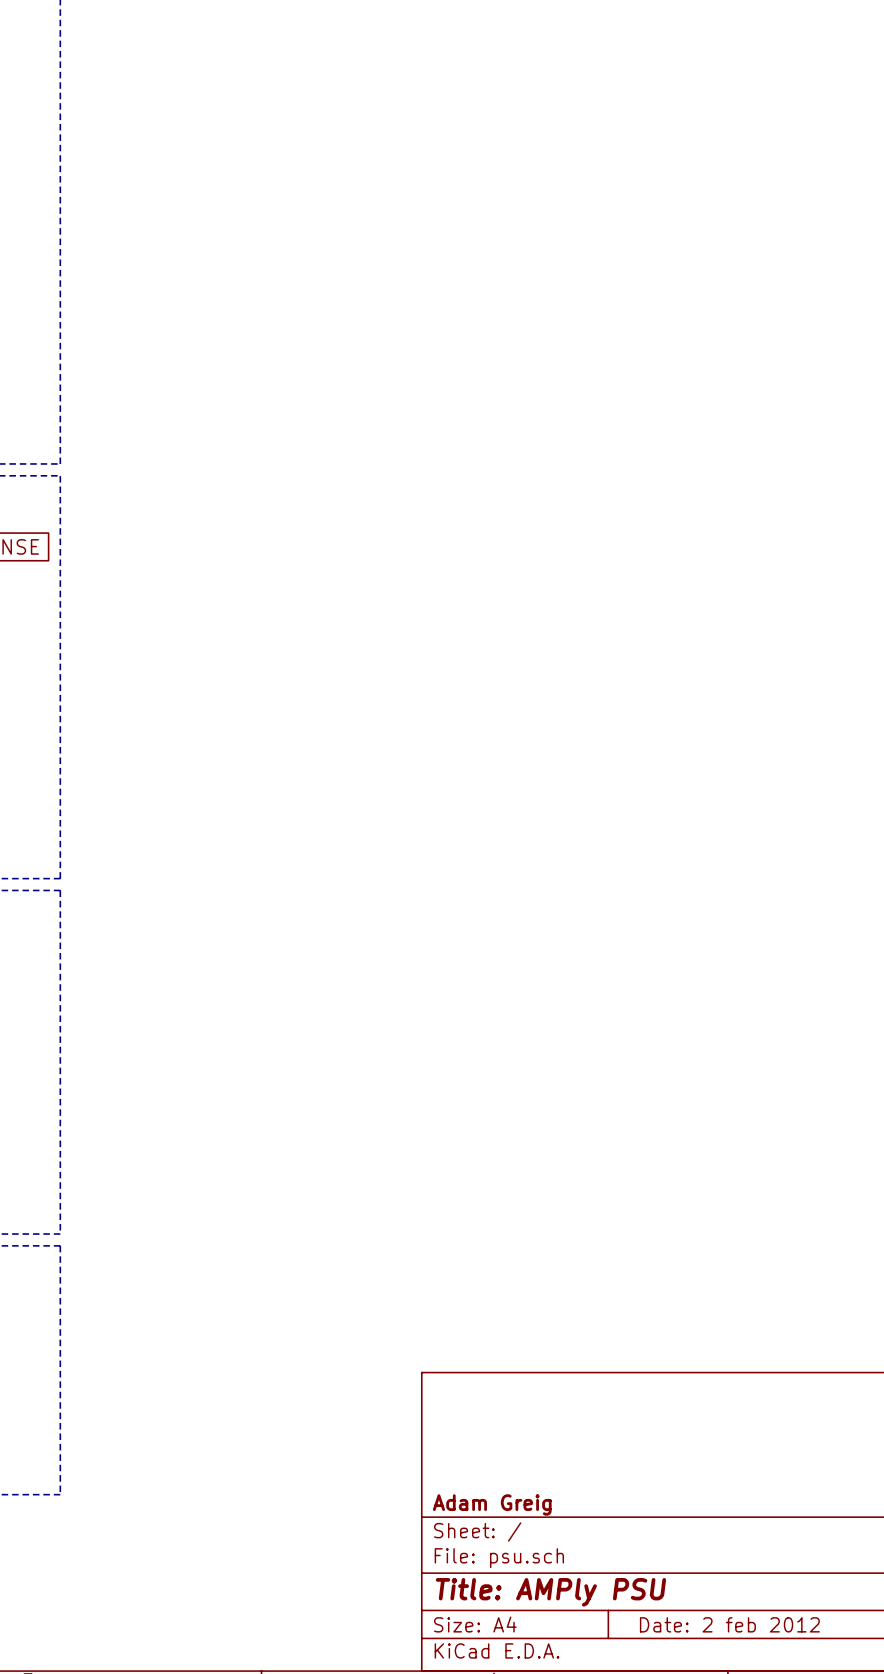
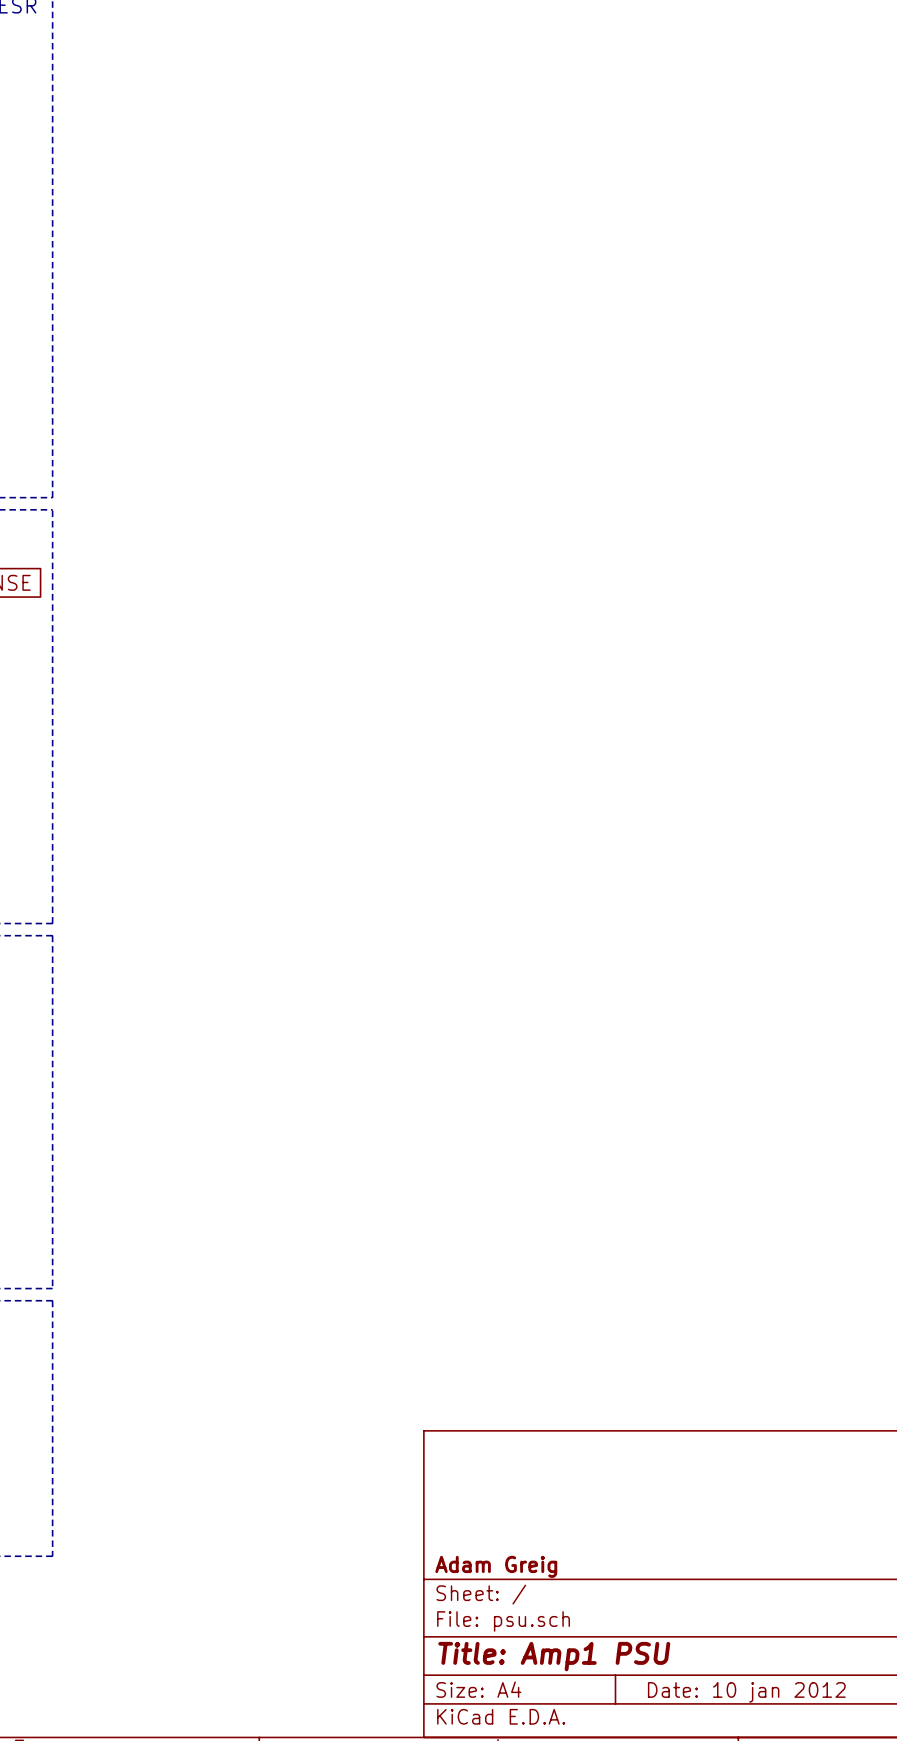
title block: Title: AMPly PSU (550, 1592) -> Title: Amp1 PSU (554, 1656)
title block: Date: 2 feb 2012 (729, 1624) -> Date: 10 jan 2012 (746, 1692)

